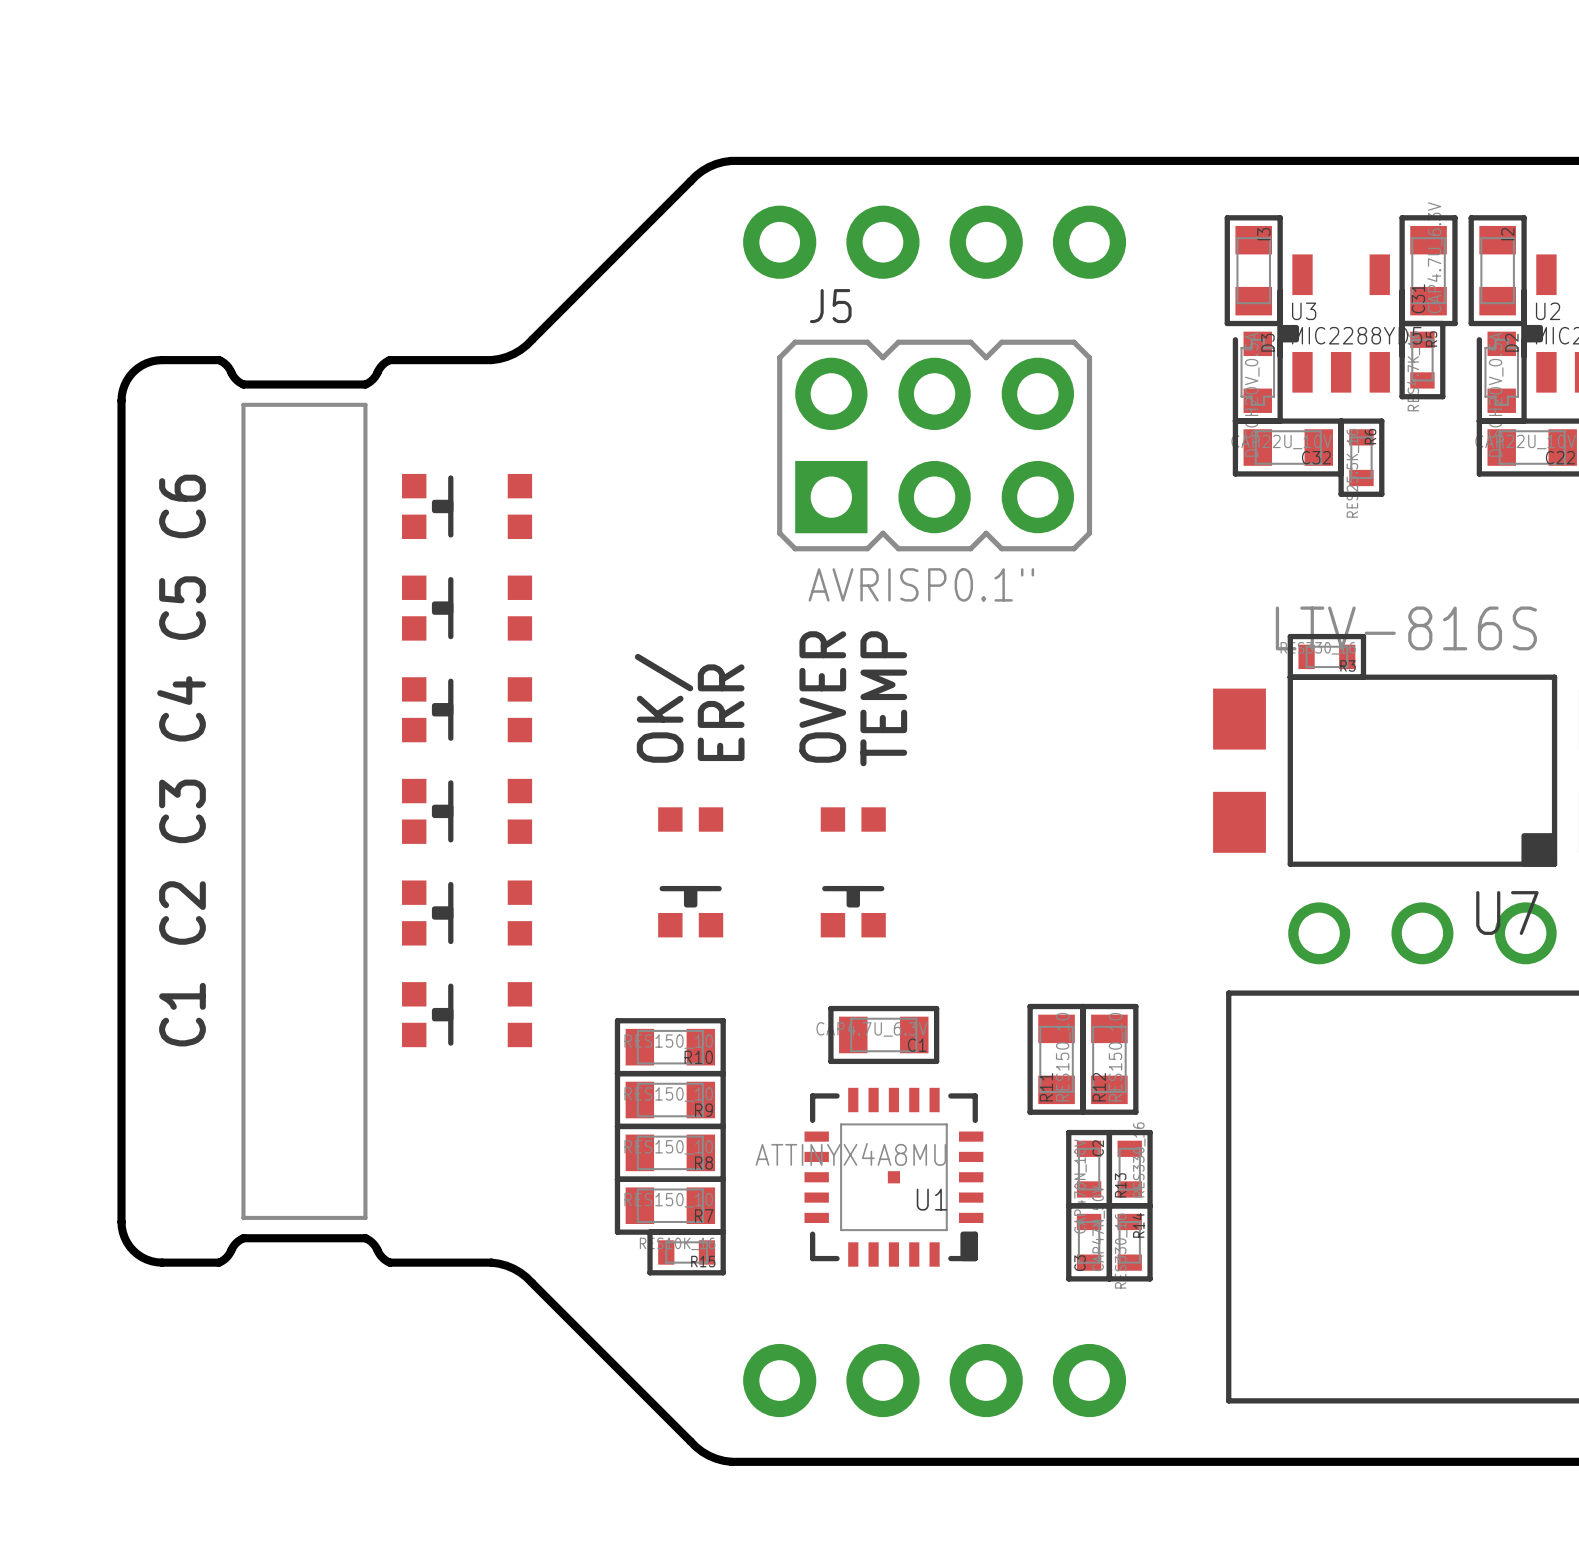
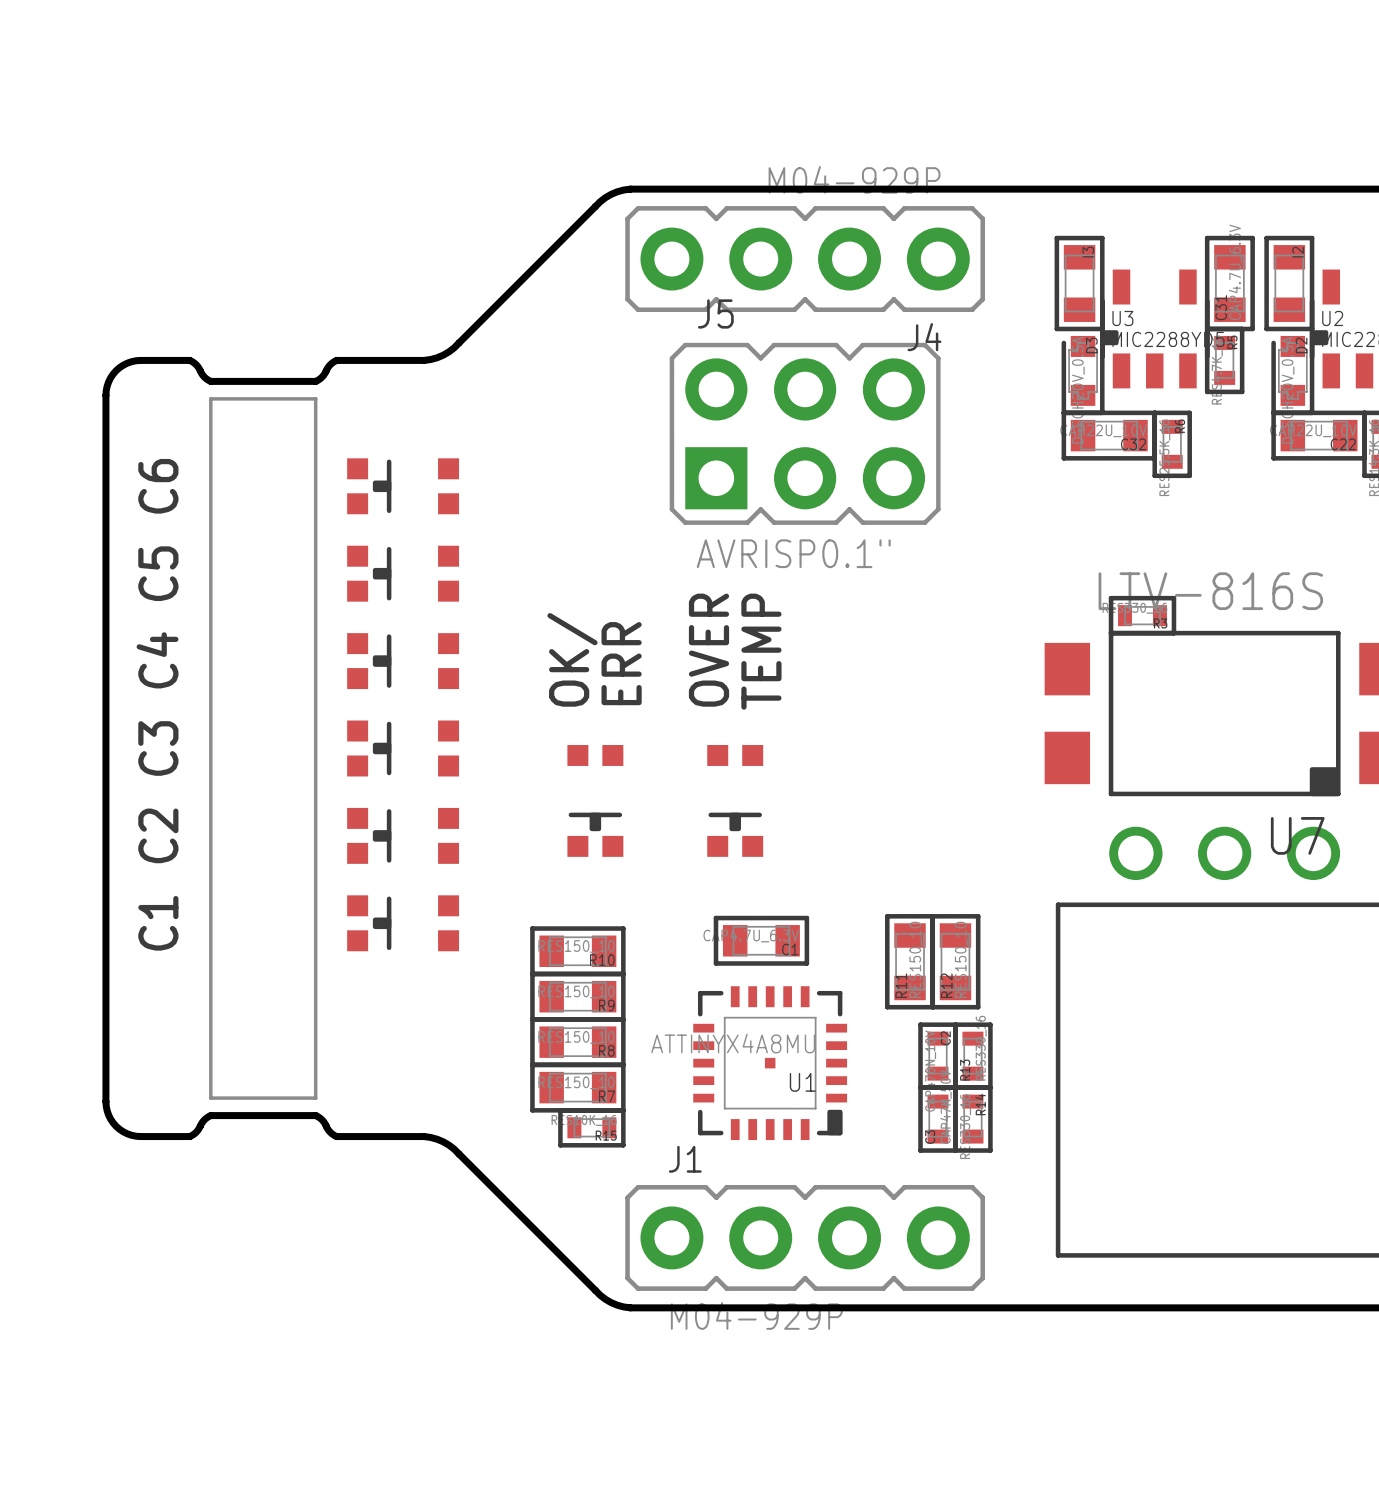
J4 side: bottom (934, 242) -> top (805, 259)
J1 side: bottom (934, 1380) -> top (805, 1237)

